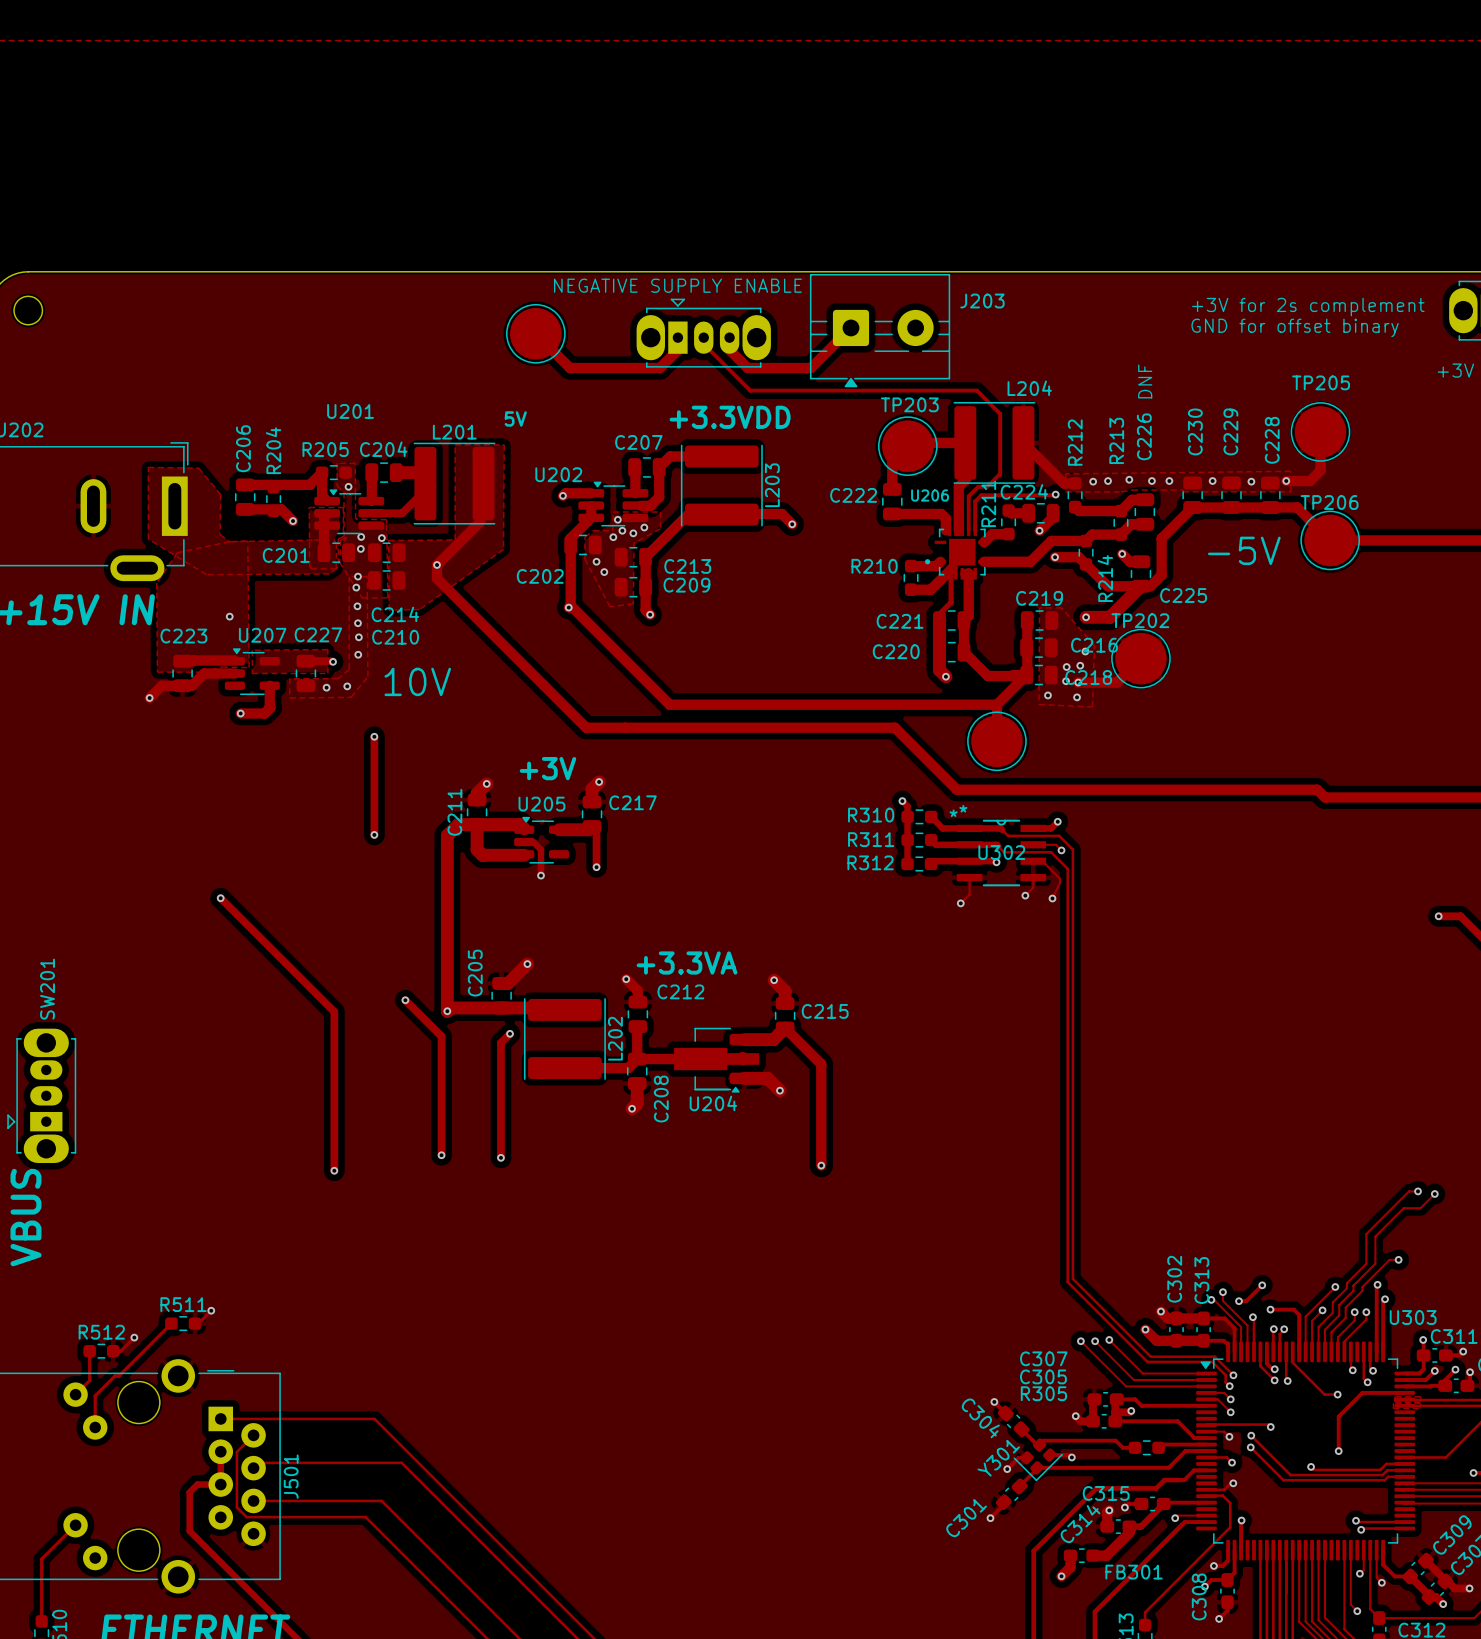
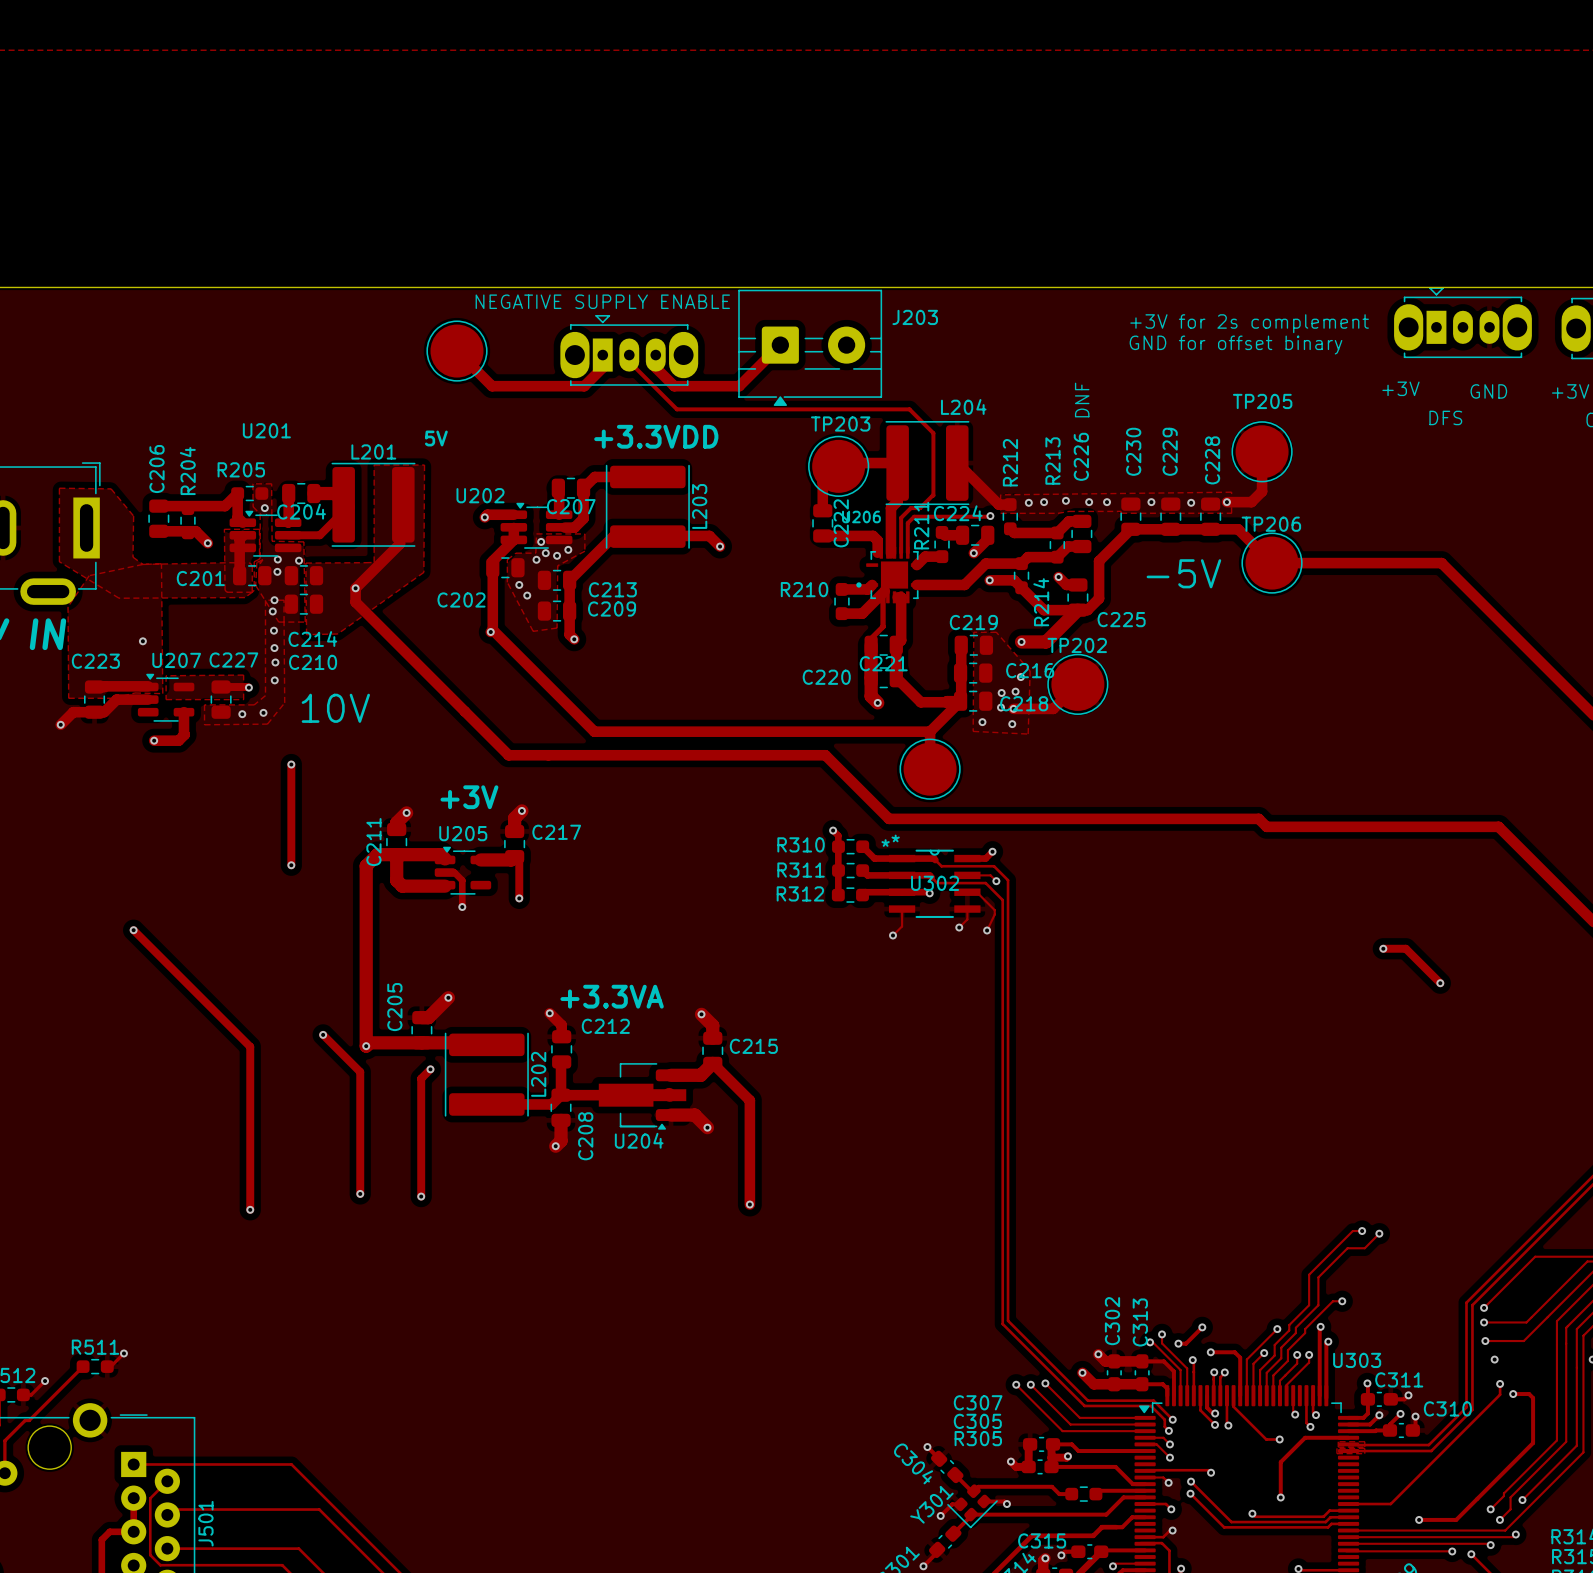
C207 name position: C207 (638, 442) -> C207 (571, 506)
C204 name position: C204 (383, 449) -> C204 (301, 511)
C222 name rotation: 0° (853, 495) -> 90° counterclockwise (841, 523)
C221 name position: C221 (900, 621) -> C221 (883, 663)

